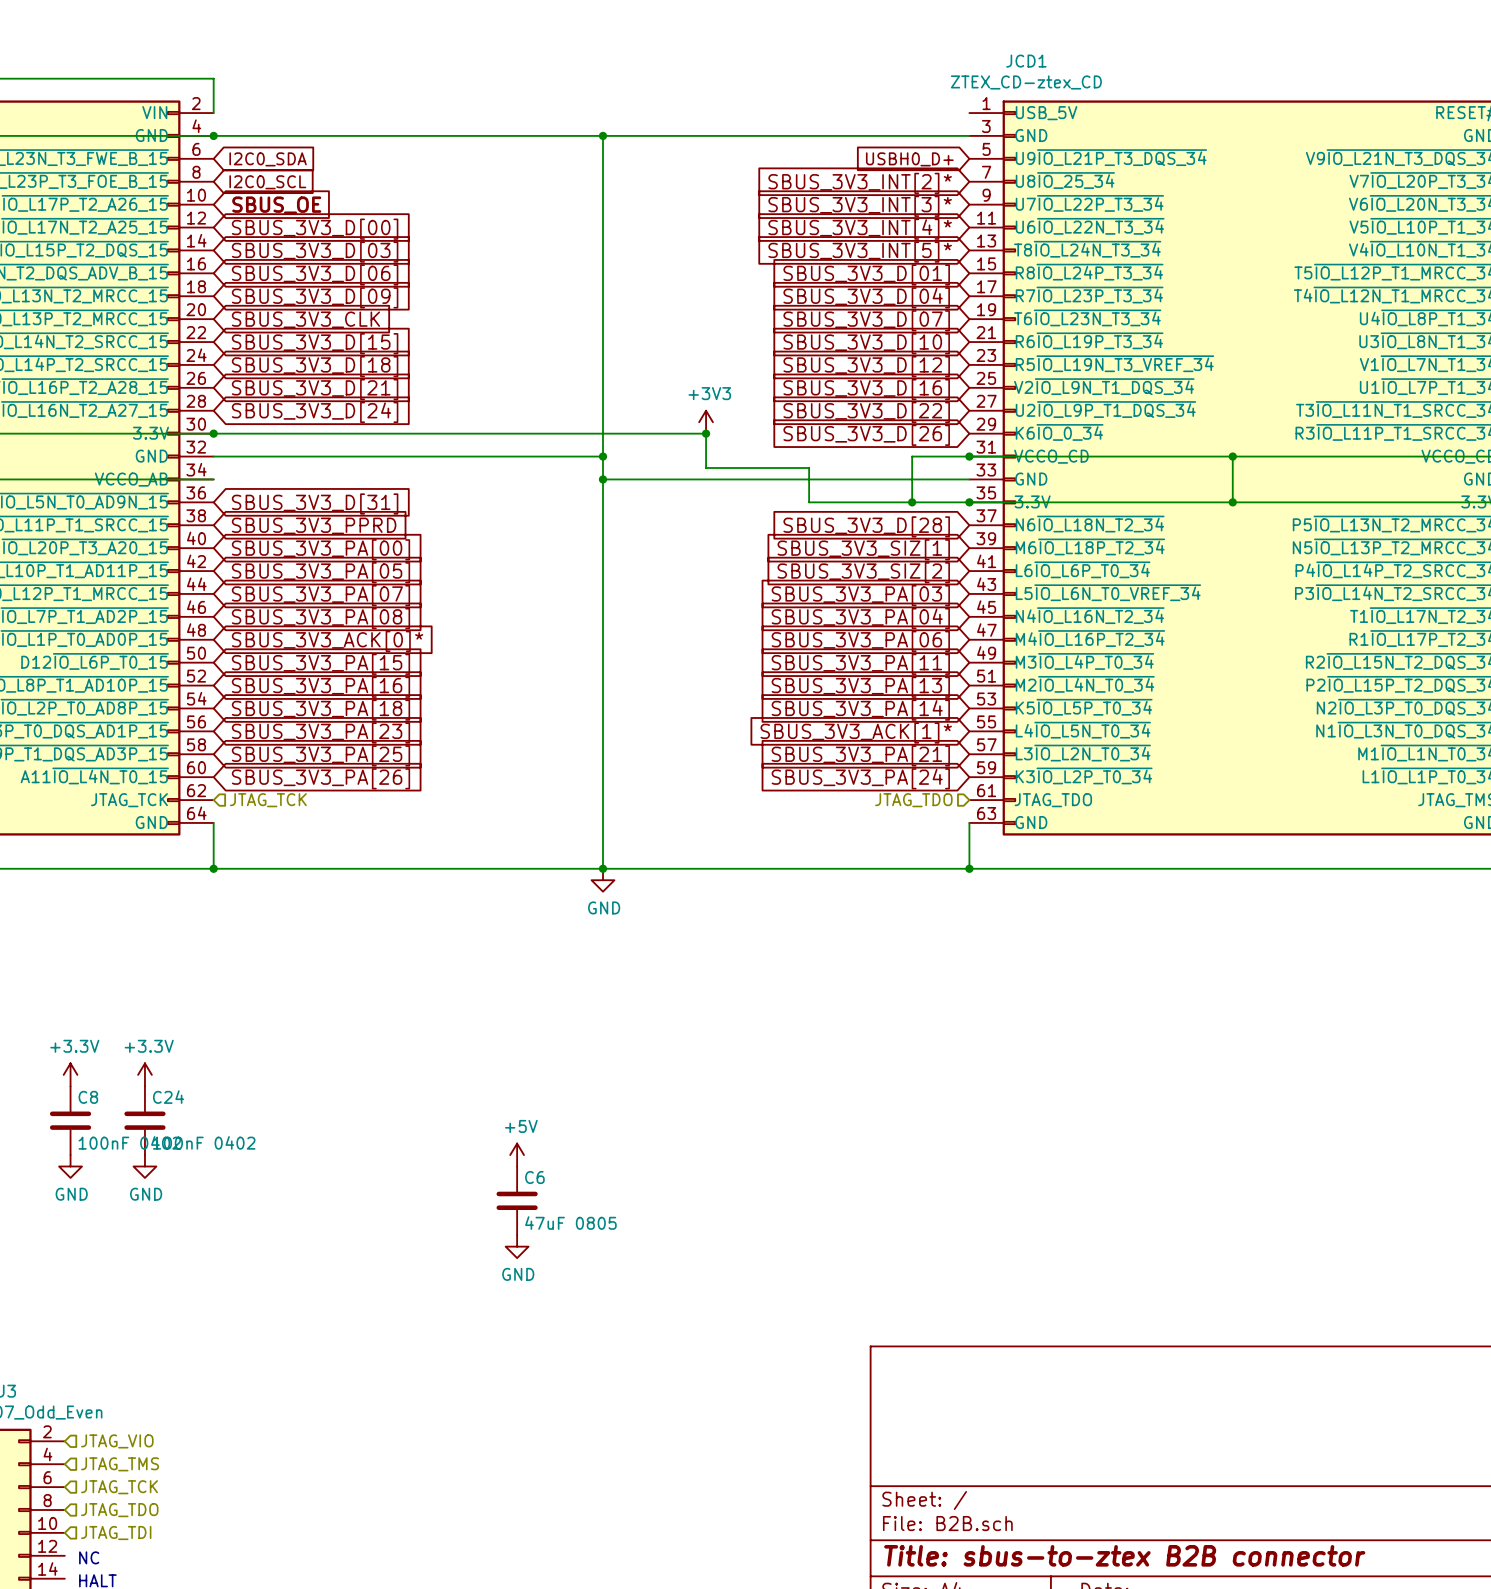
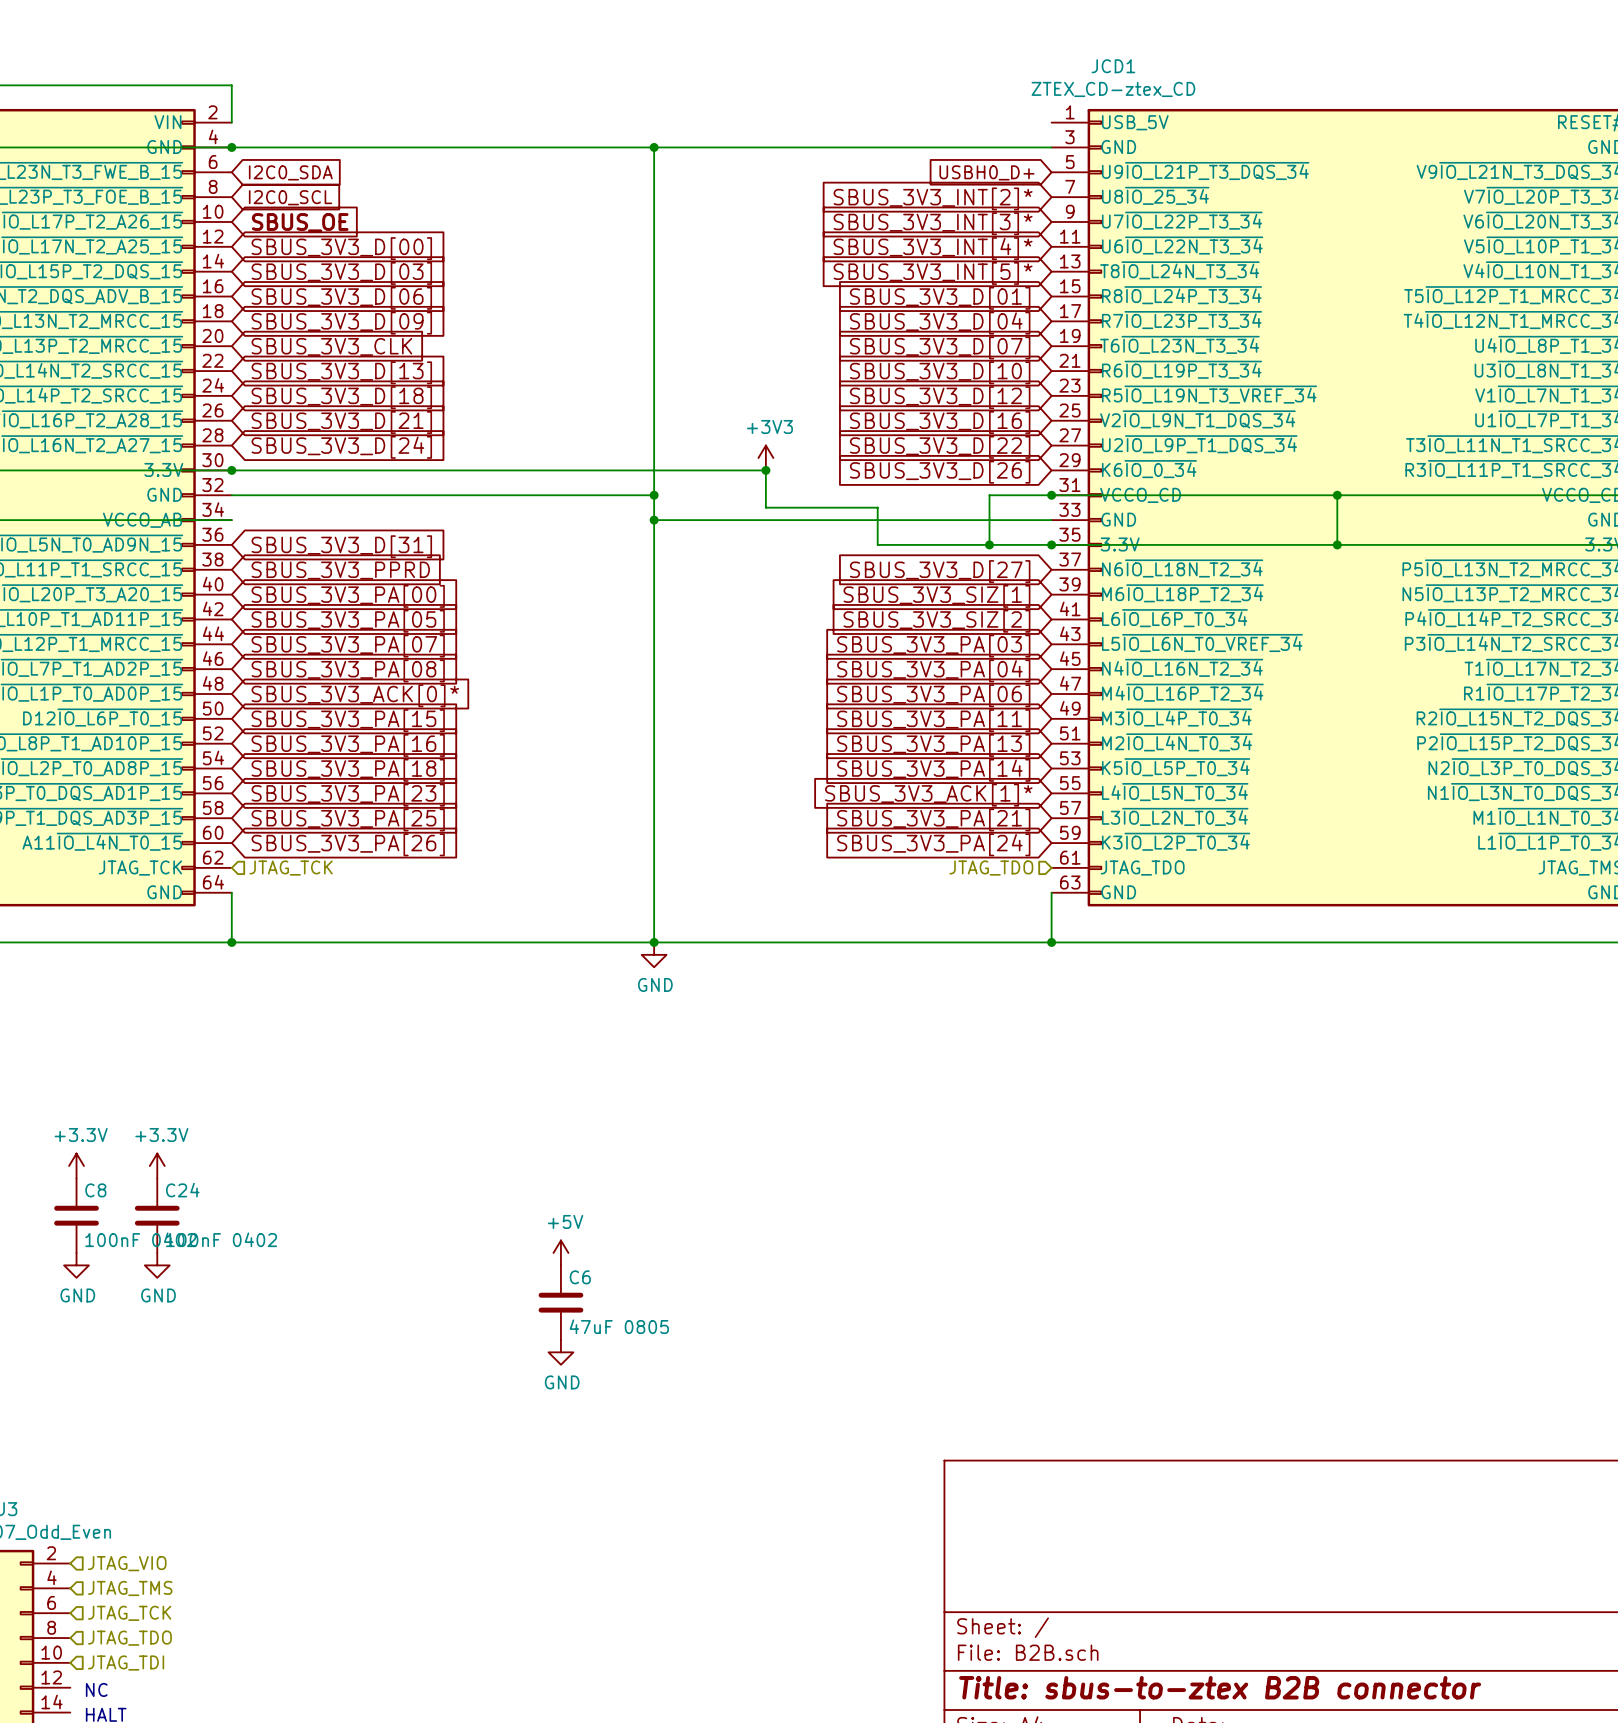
global label: SBUS_3V3_D[15] (315, 343) -> SBUS_3V3_D[13] (341, 372)
global label: SBUS_3V3_D[28] (866, 526) -> SBUS_3V3_D[27] (940, 571)

